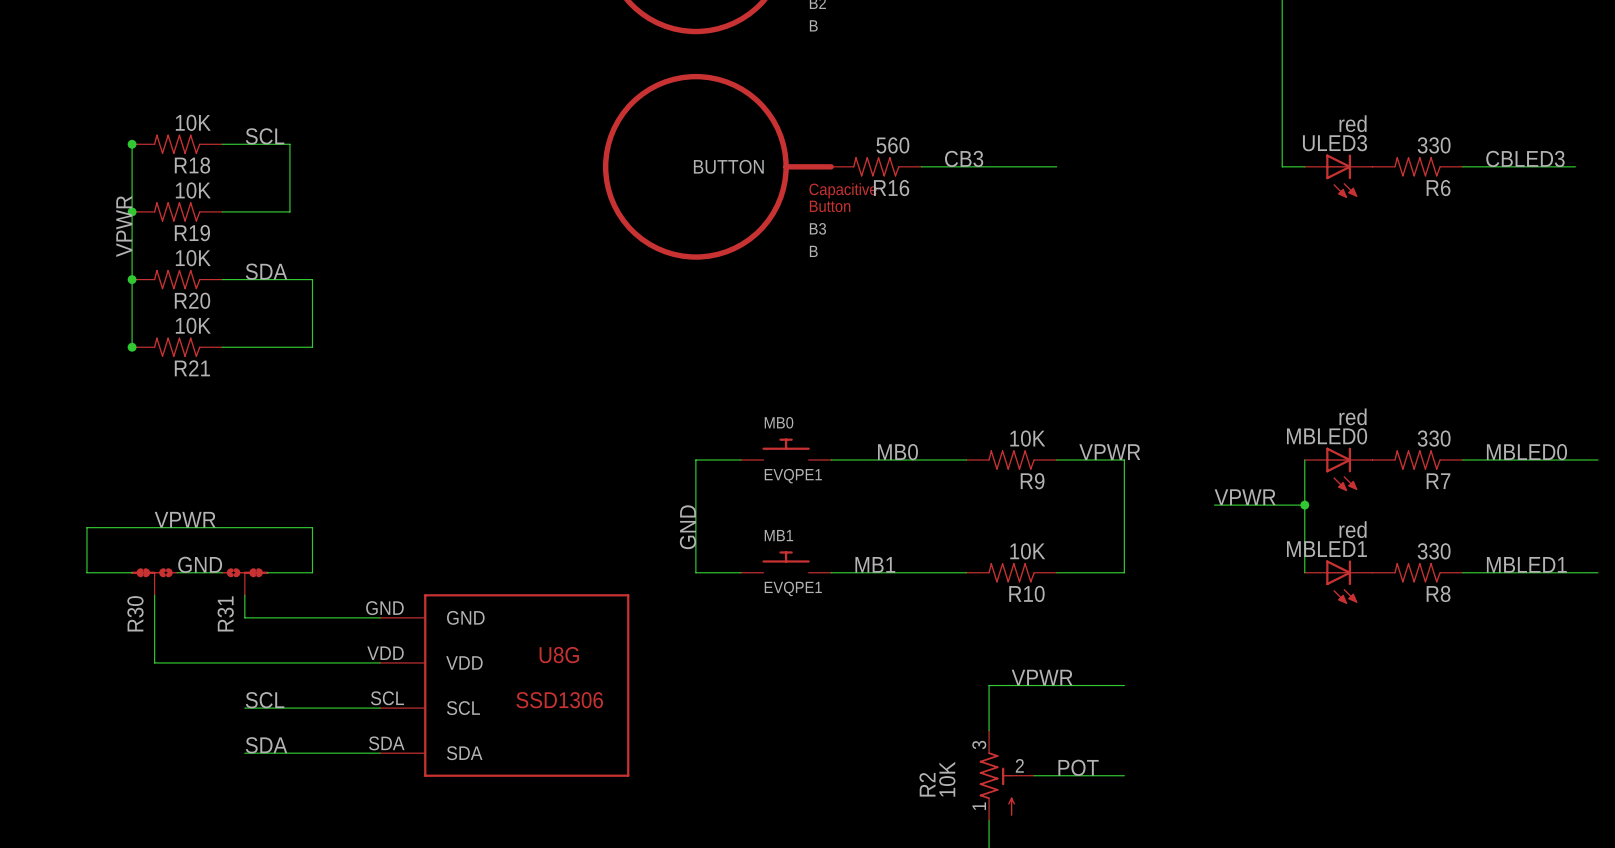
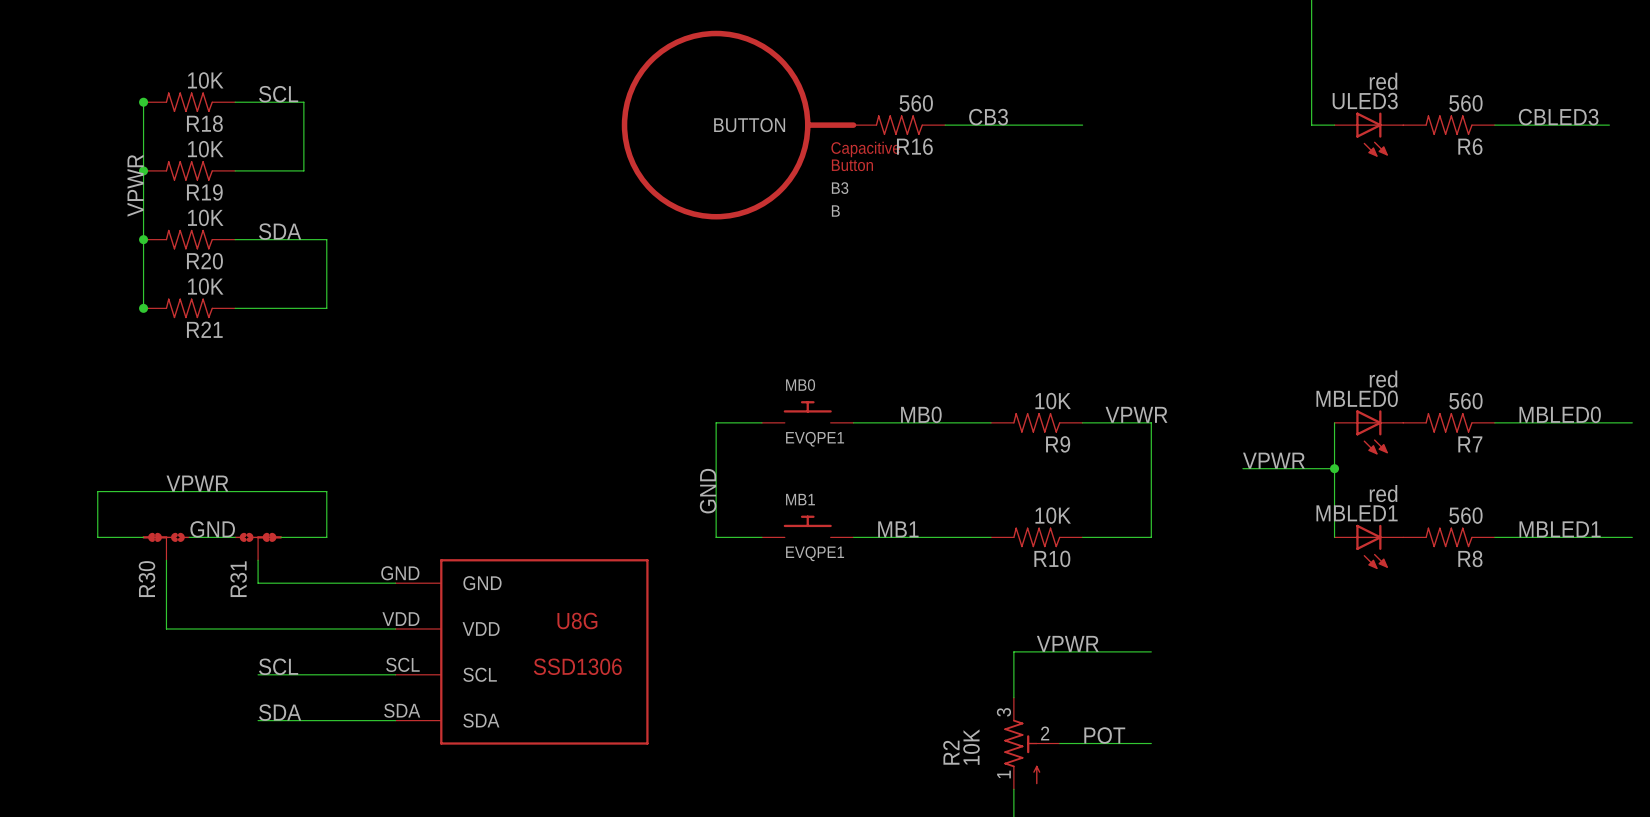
R6 value: 330 (1434, 145) -> 560 (1465, 103)
R7 value: 330 (1434, 438) -> 560 (1465, 401)
R8 value: 330 (1434, 551) -> 560 (1465, 515)

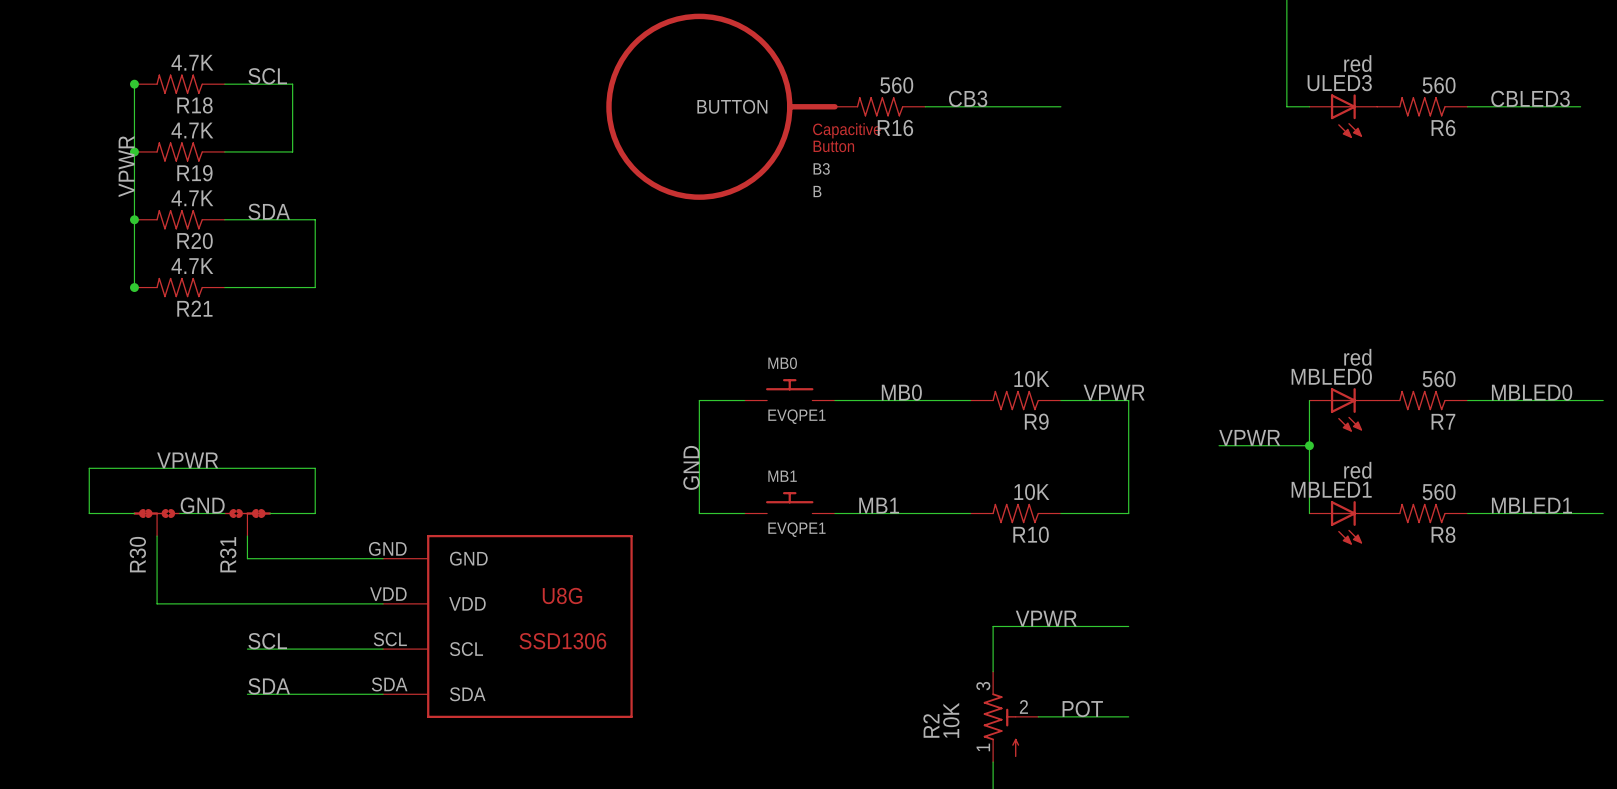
R18 value: 10K (205, 80) -> 4.7K (192, 62)
R19 value: 10K (205, 149) -> 4.7K (192, 130)
R20 value: 10K (205, 217) -> 4.7K (192, 198)
R21 value: 10K (205, 286) -> 4.7K (192, 266)

